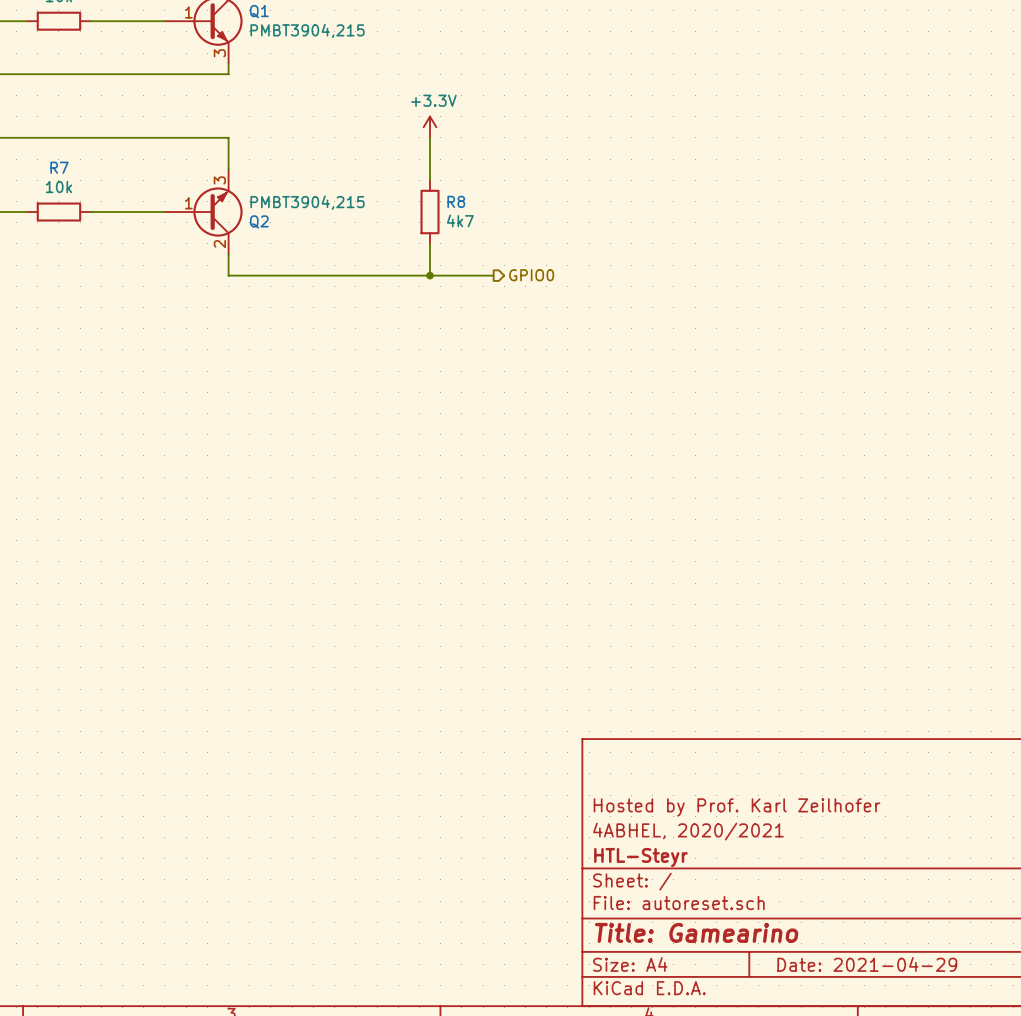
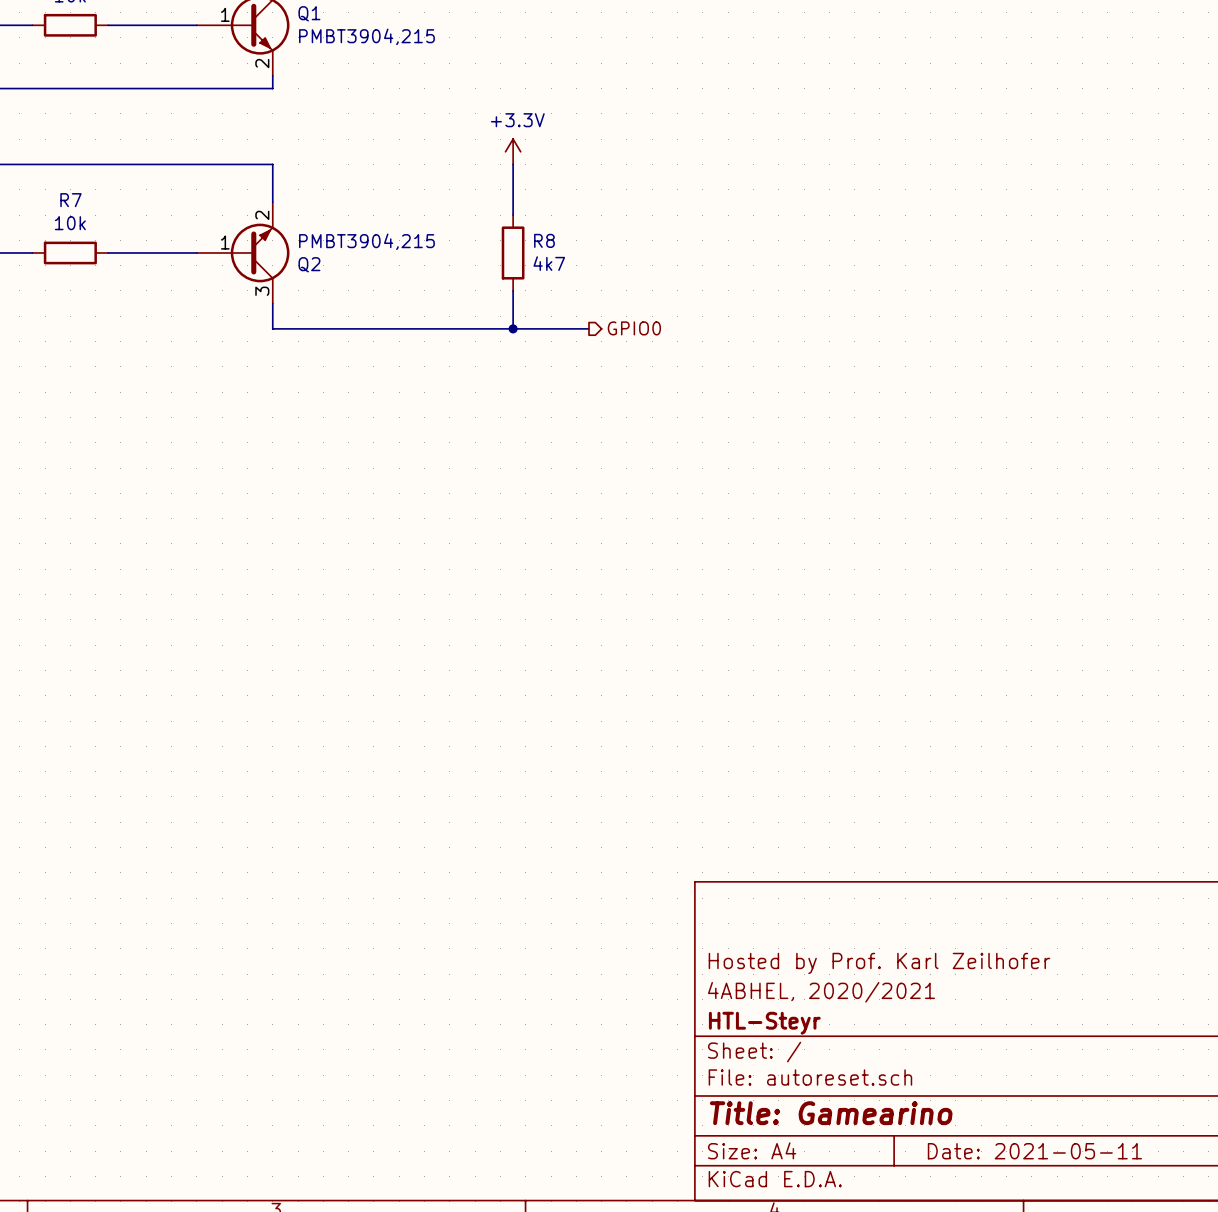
Q1 pin number: 3 (219, 53) -> 2 (262, 63)
Q2 pin number: 3 (219, 180) -> 2 (262, 215)
Q2 pin number: 2 (219, 244) -> 3 (262, 291)
title block: Date: 2021-04-29 (867, 964) -> Date: 2021-05-11 (1034, 1151)

